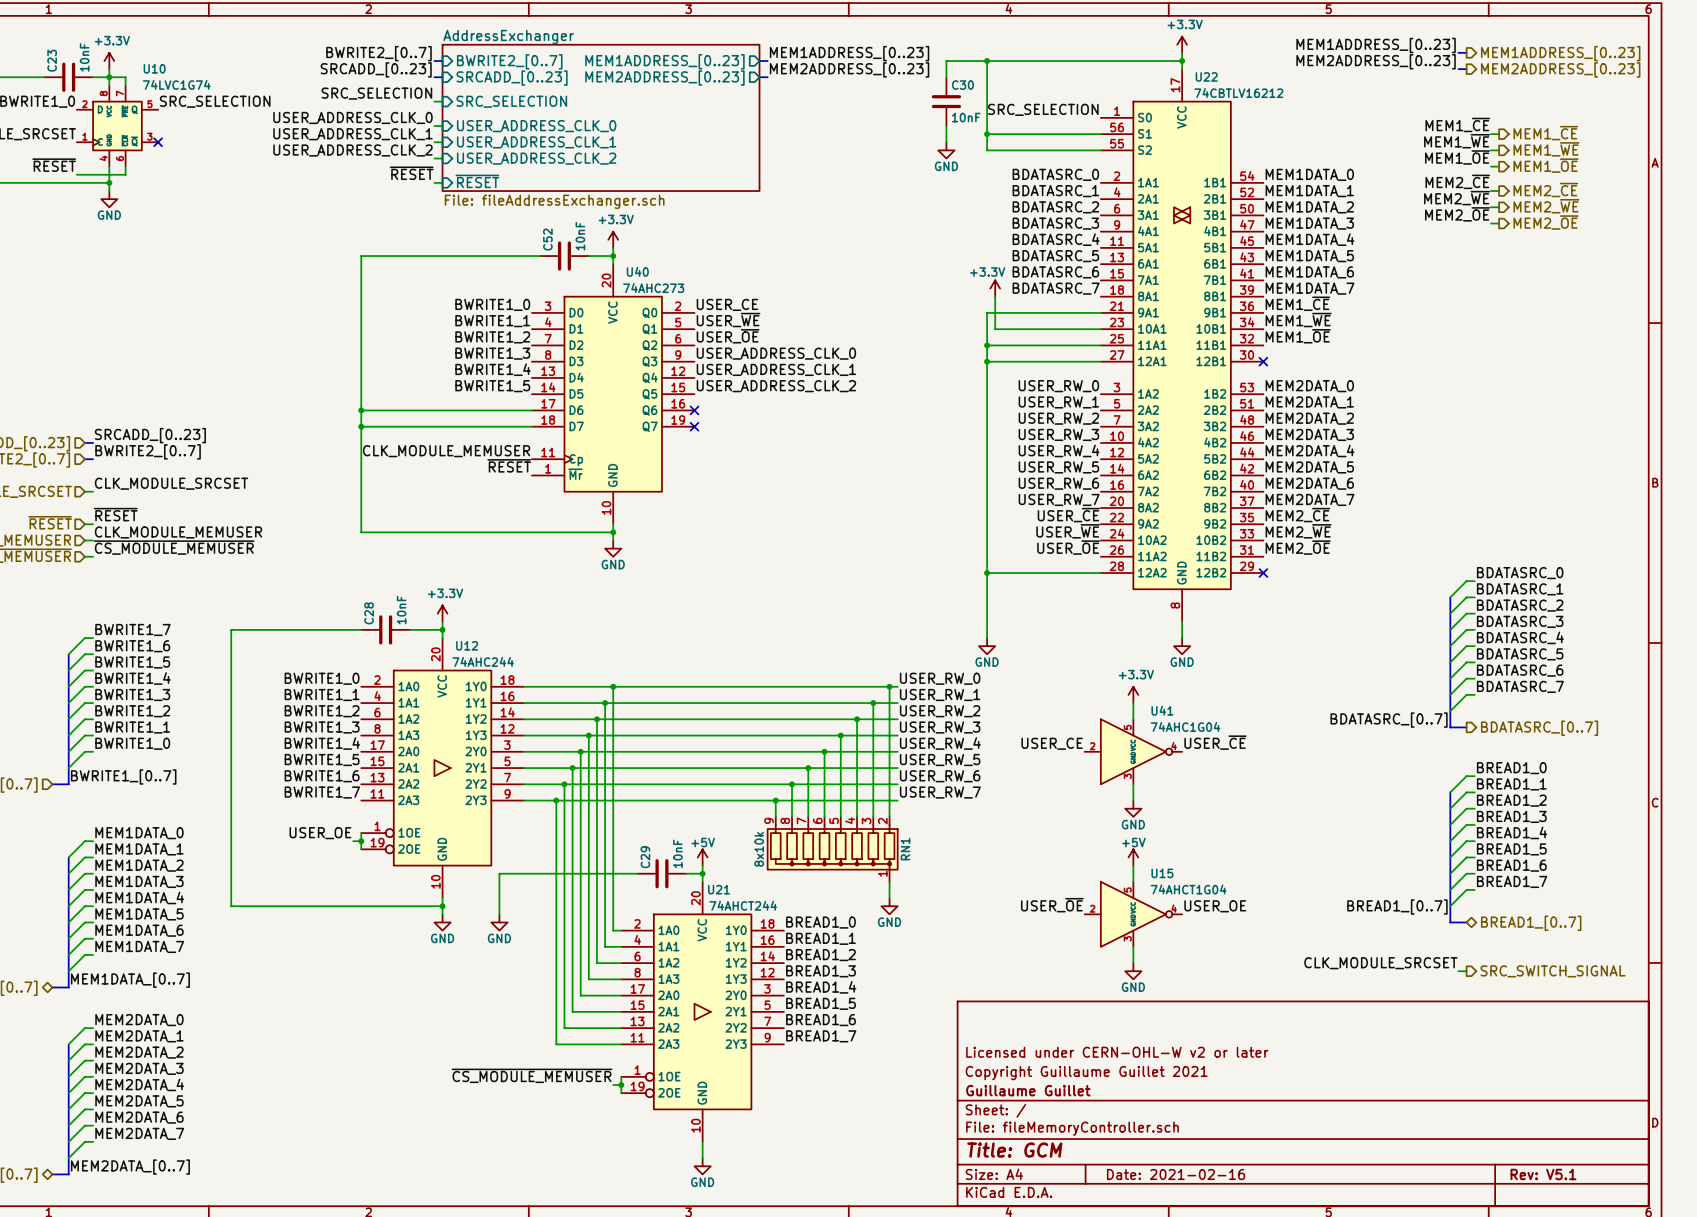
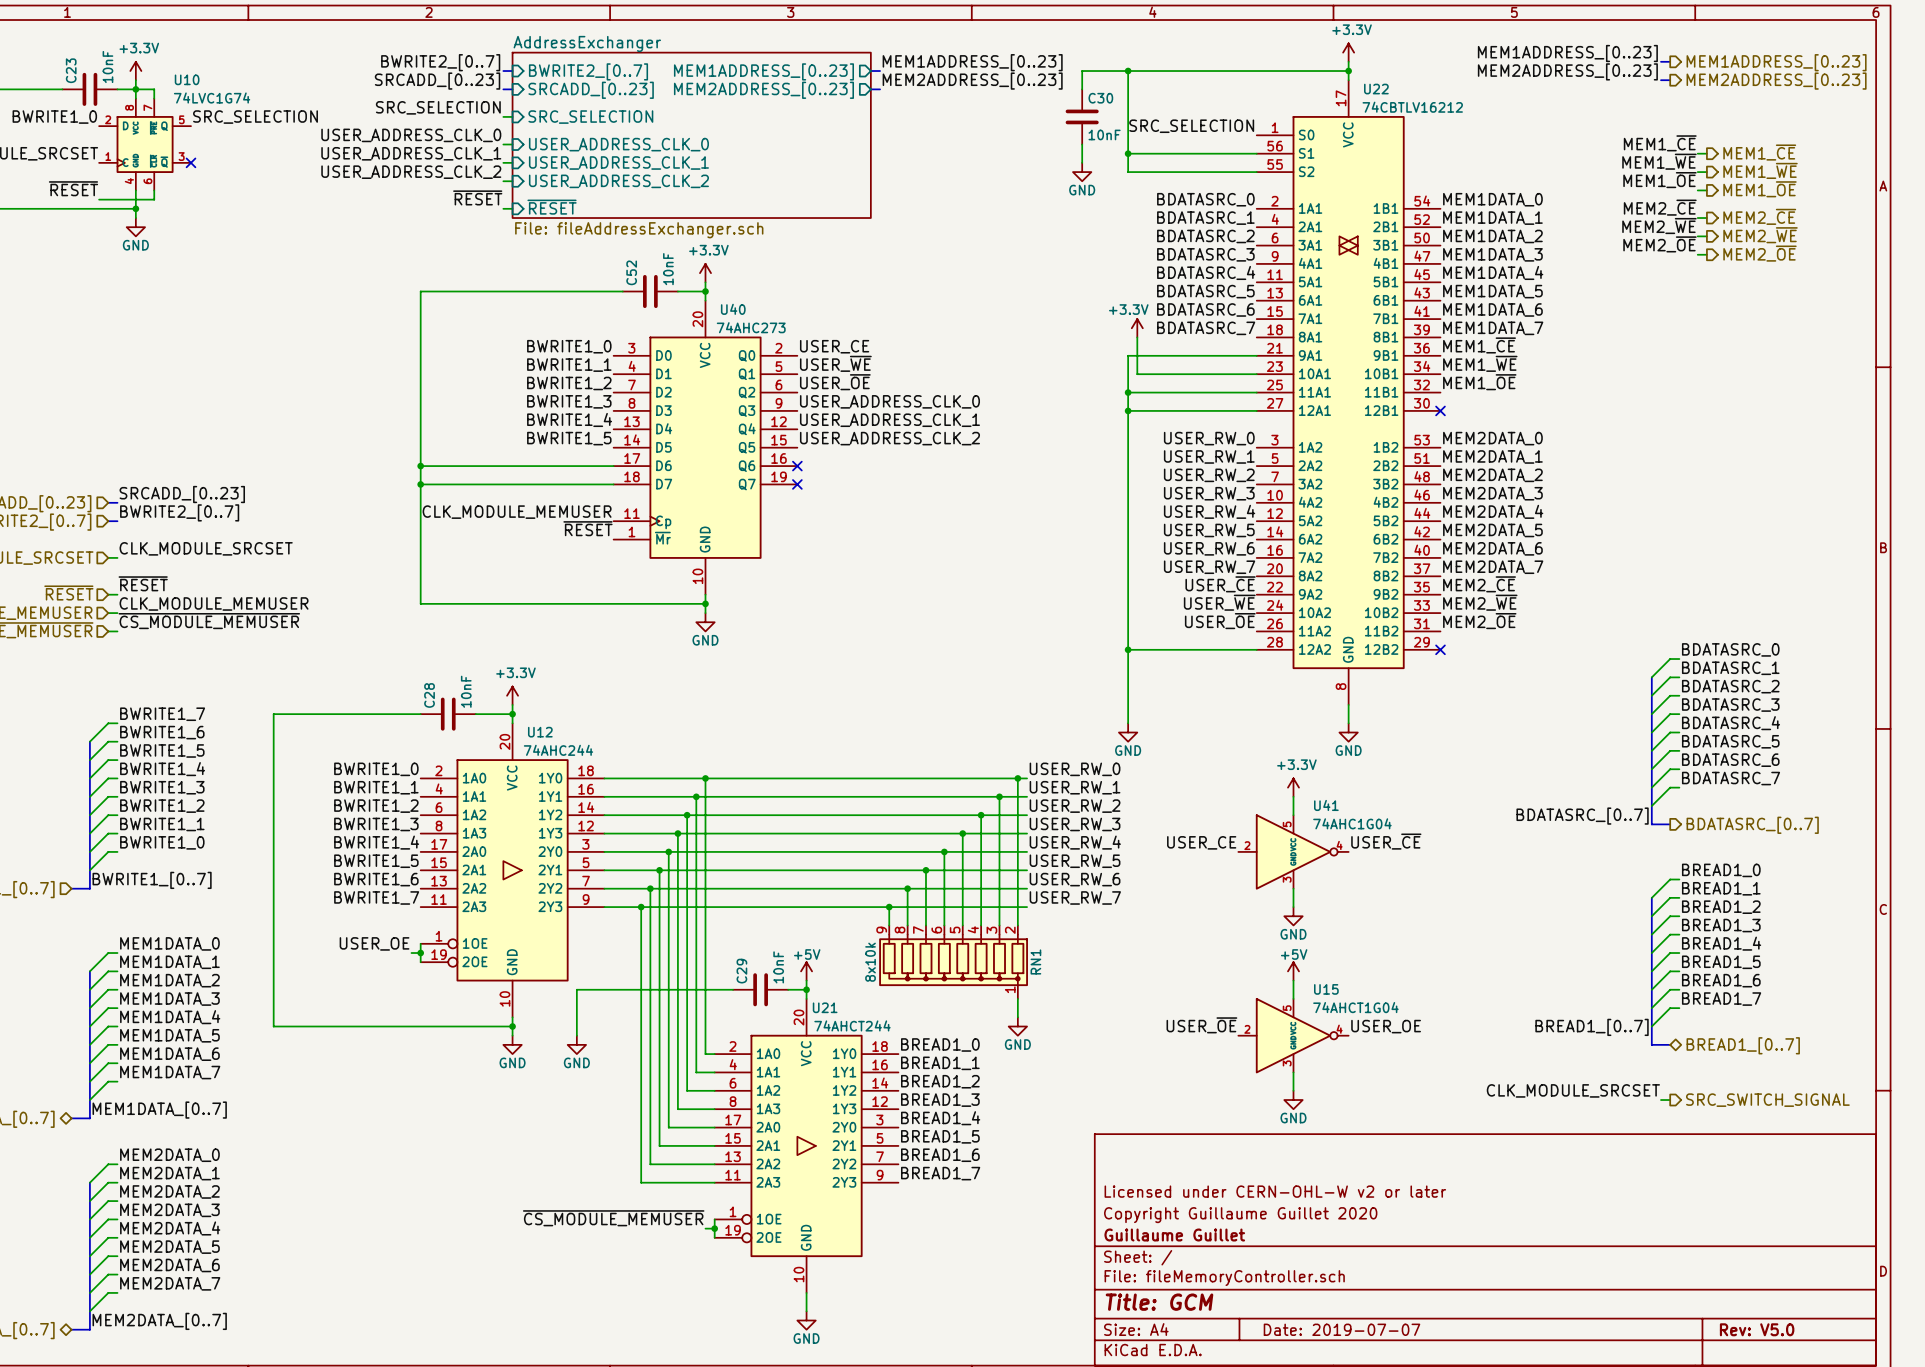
title block: Copyright Guillaume Guillet 2021 (1086, 1073) -> Copyright Guillaume Guillet 2020 (1240, 1215)
title block: Date: 2021-02-16 (1176, 1174) -> Date: 2019-07-07 (1341, 1329)
title block: Rev: V5.1 (1543, 1174) -> Rev: V5.0 (1757, 1329)

